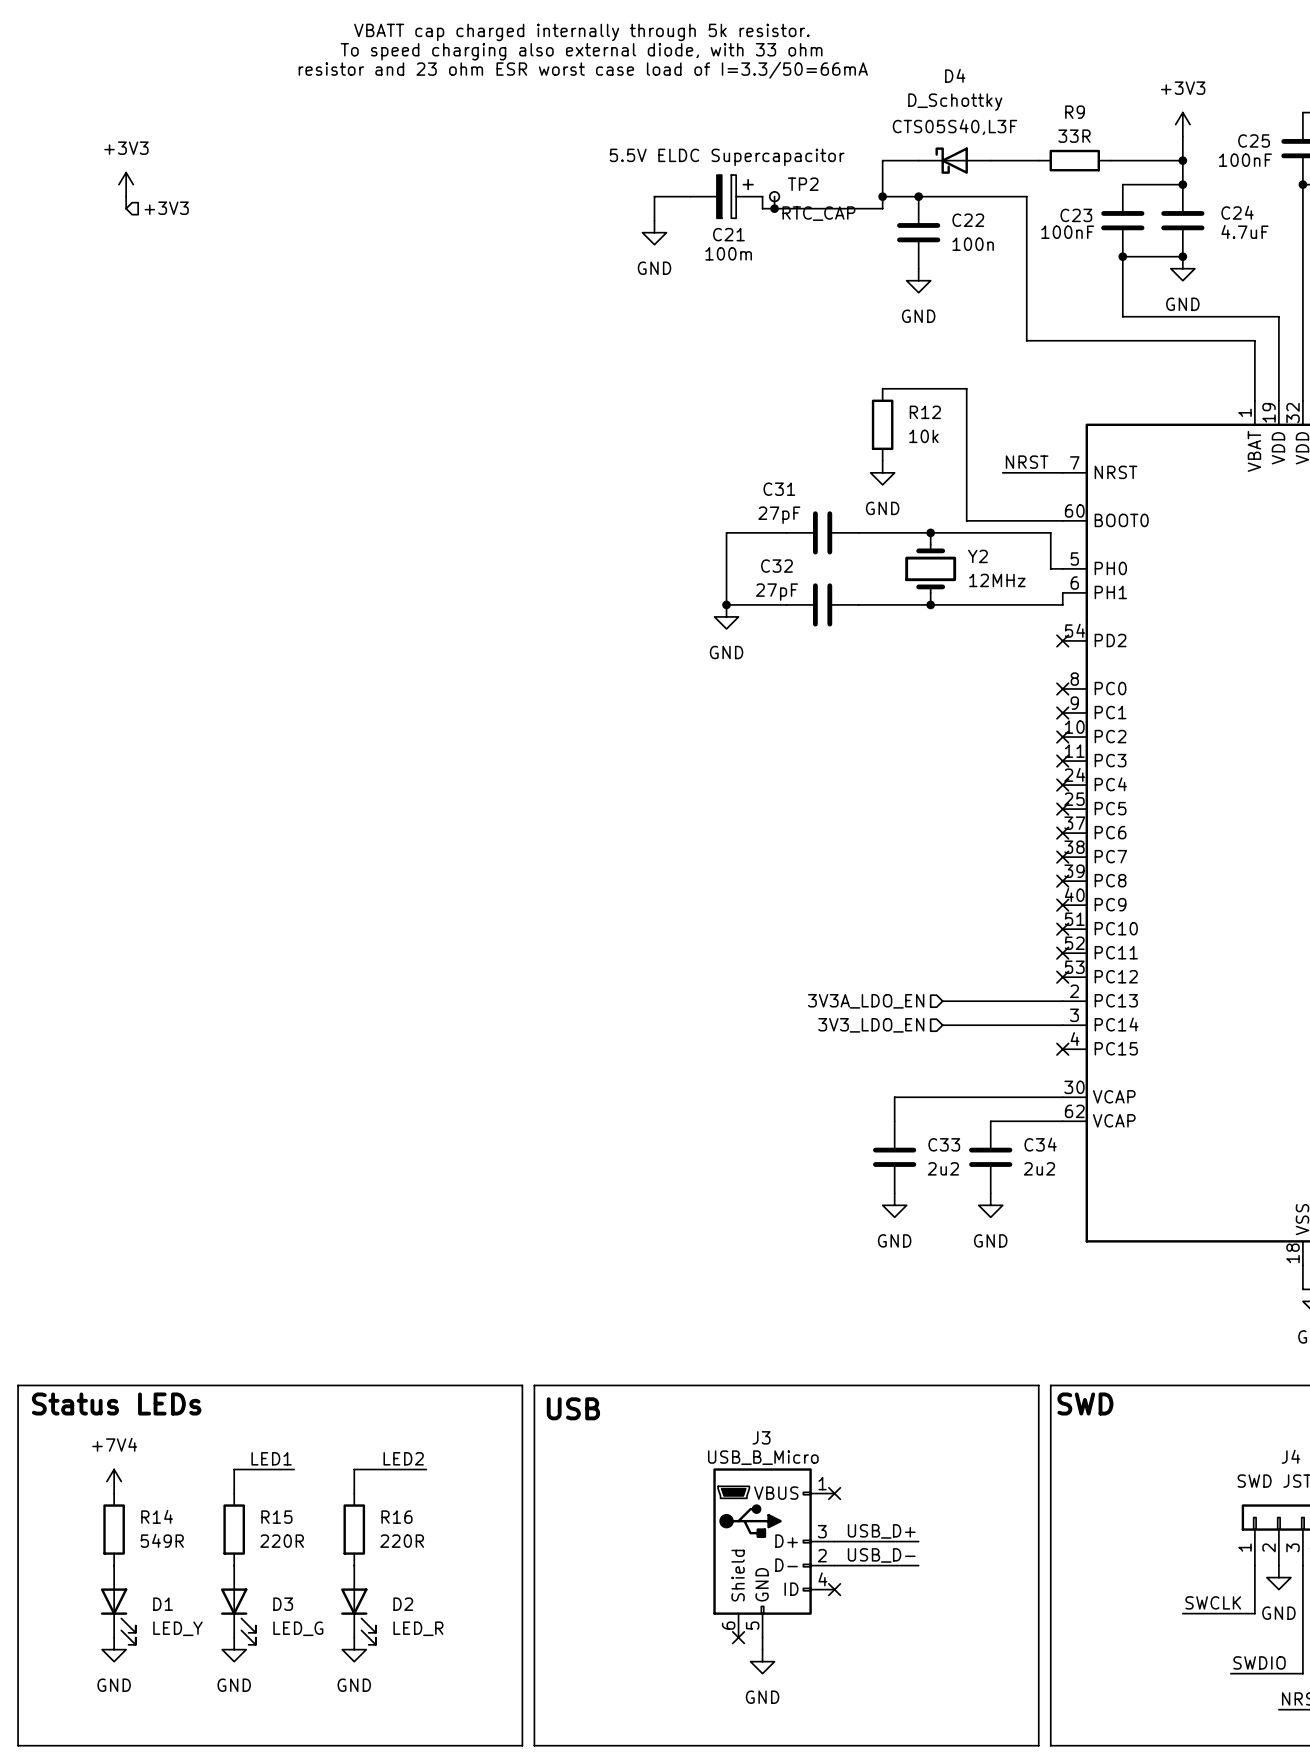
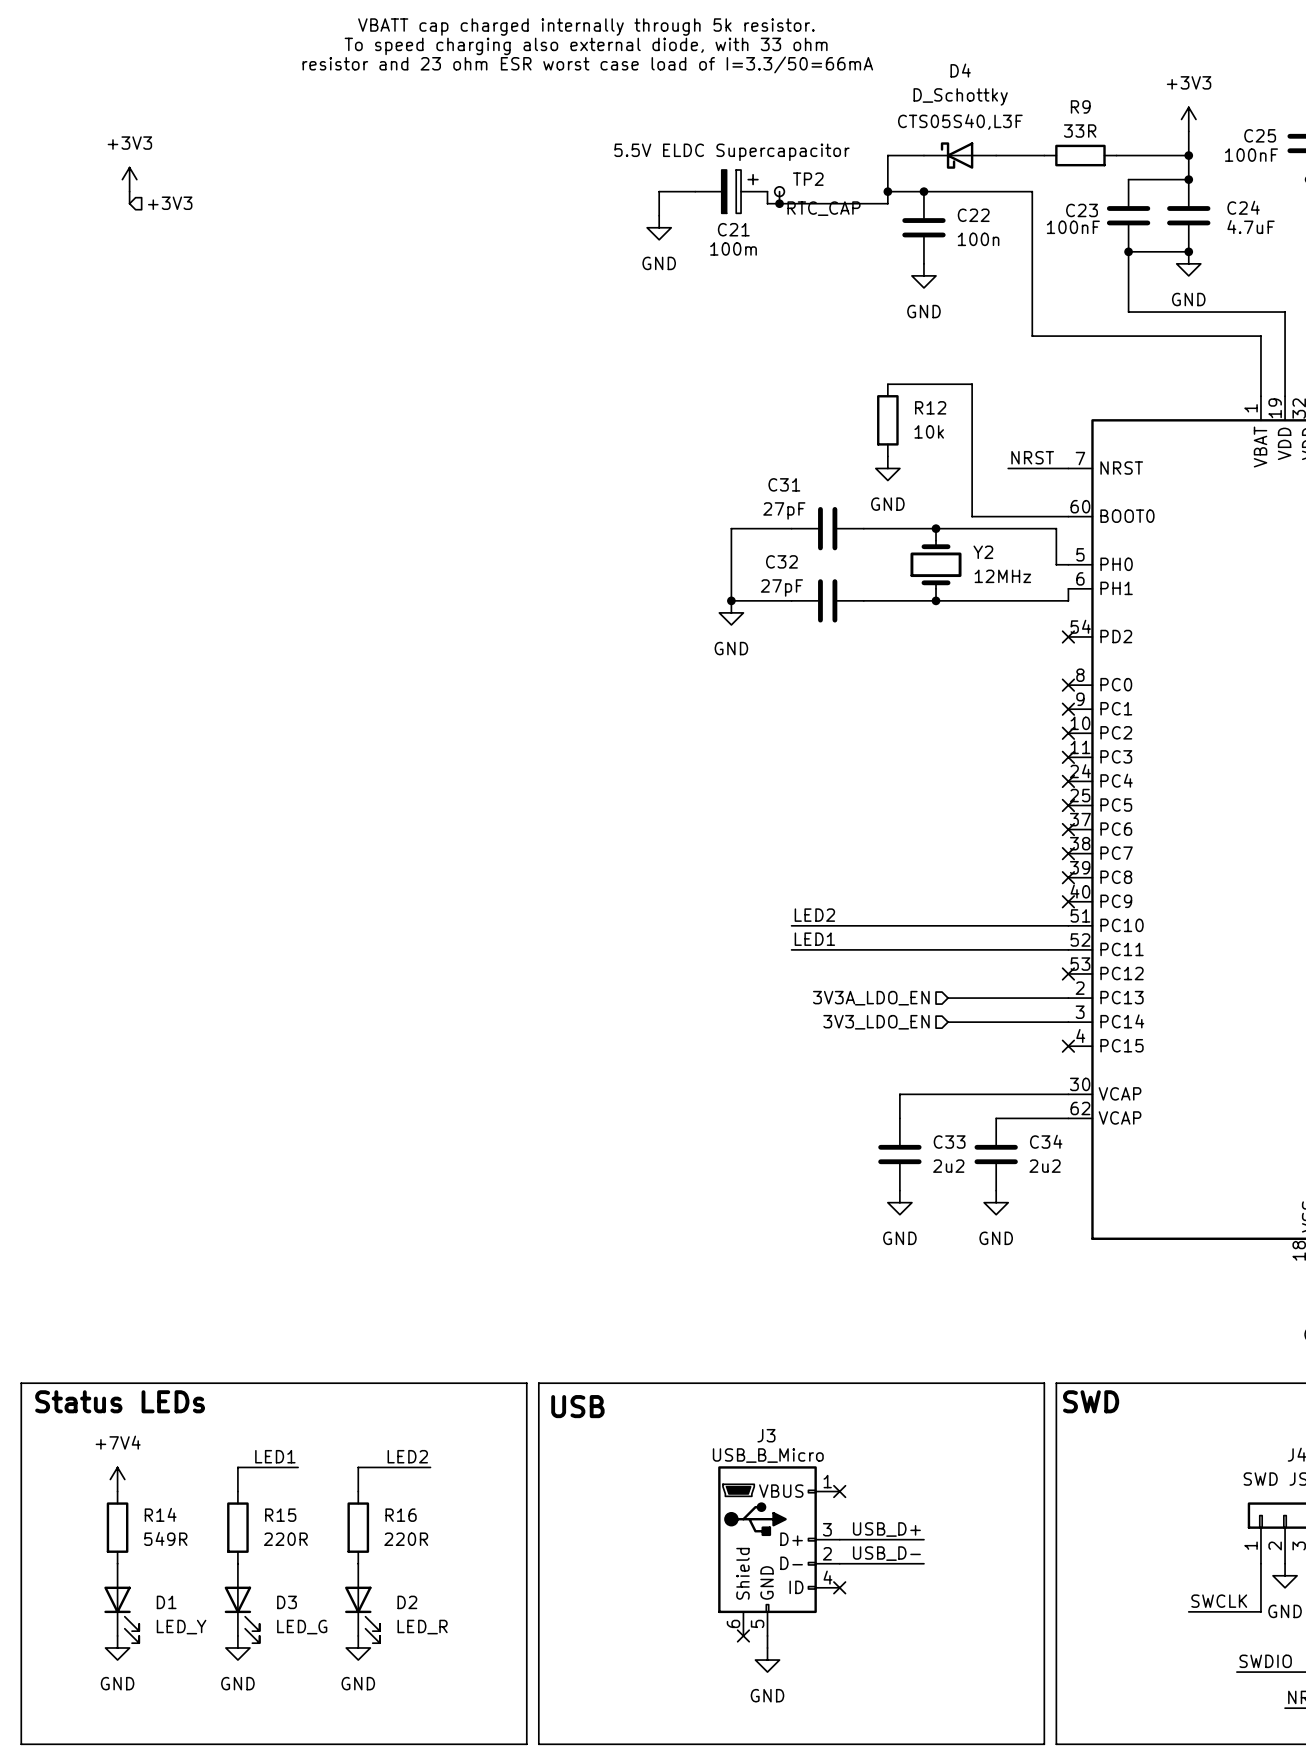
label: none -> LED2 (814, 915)
wire: none -> (791, 925) (1068, 925)
no-connect mark: (1062, 929) -> none
label: none -> LED1 (814, 939)
wire: none -> (791, 949) (1068, 949)
no-connect mark: (1062, 953) -> none

